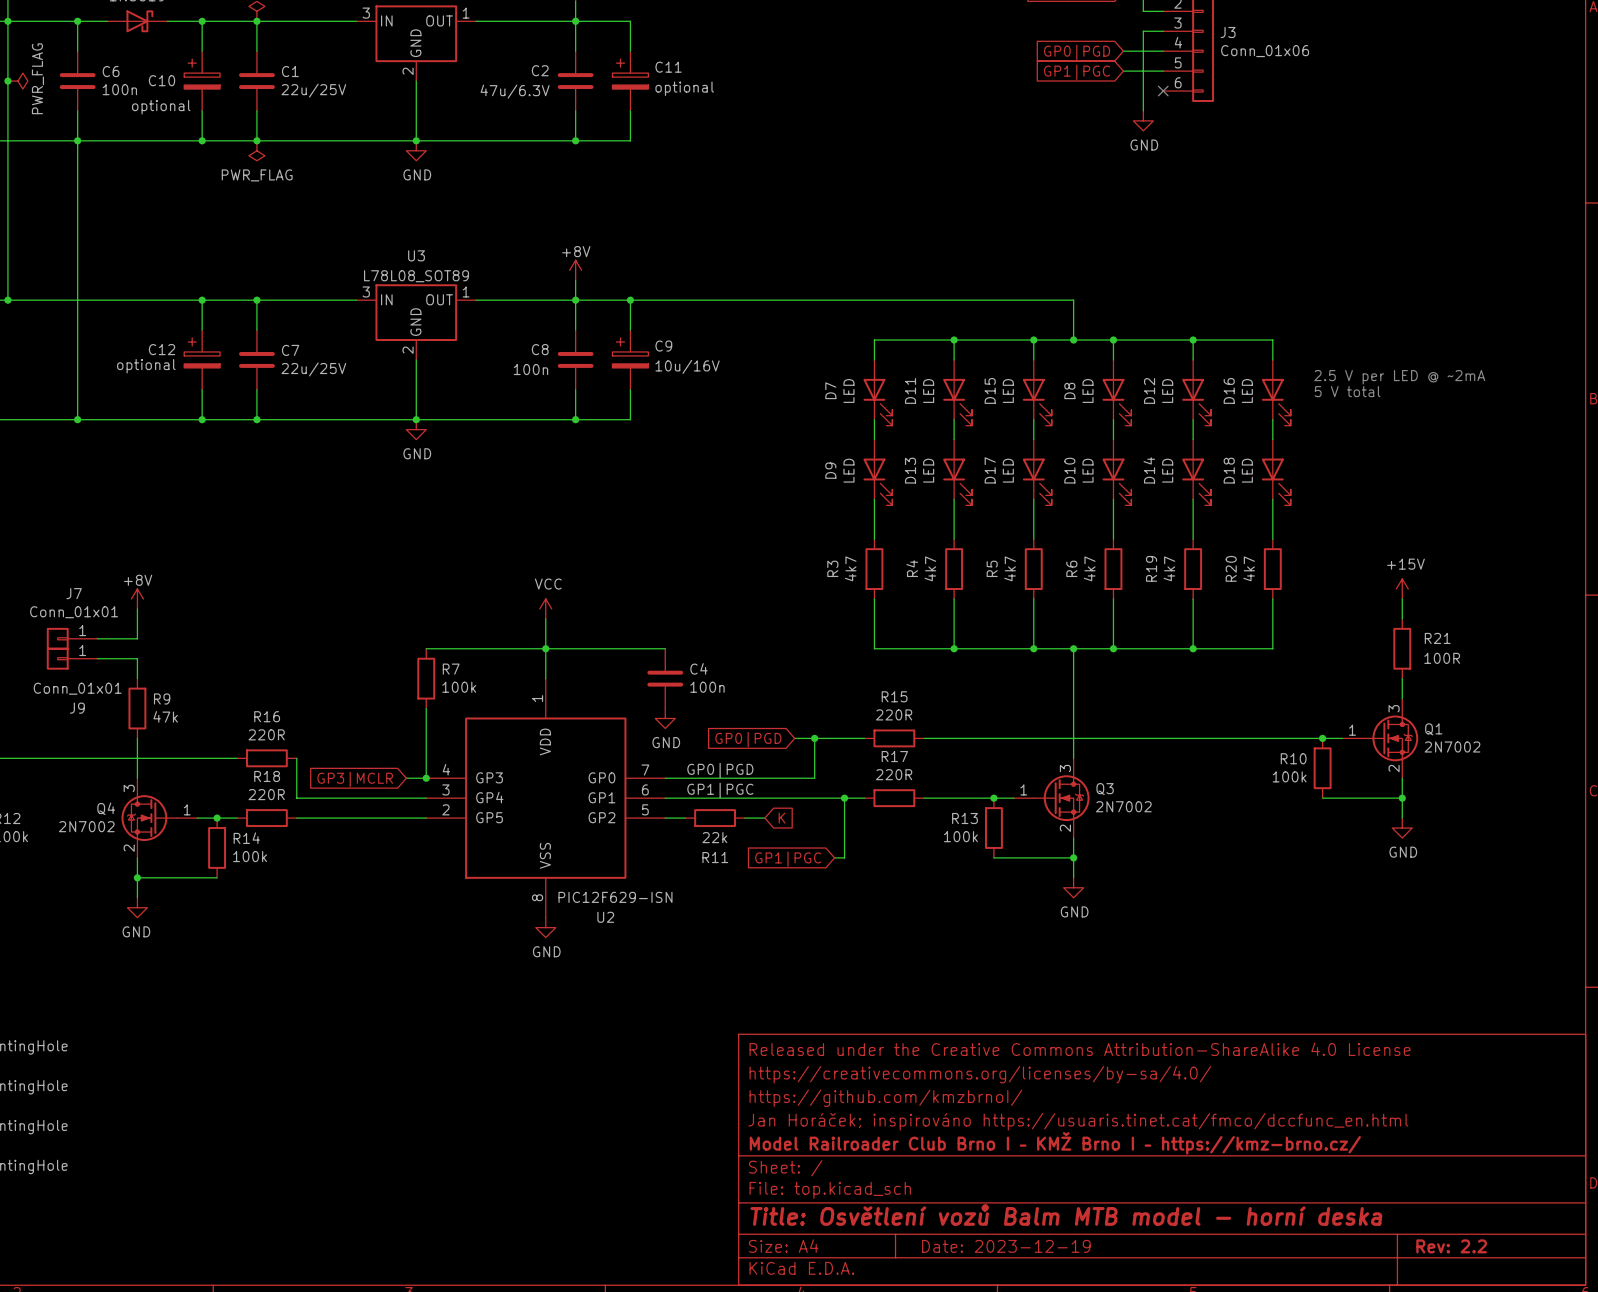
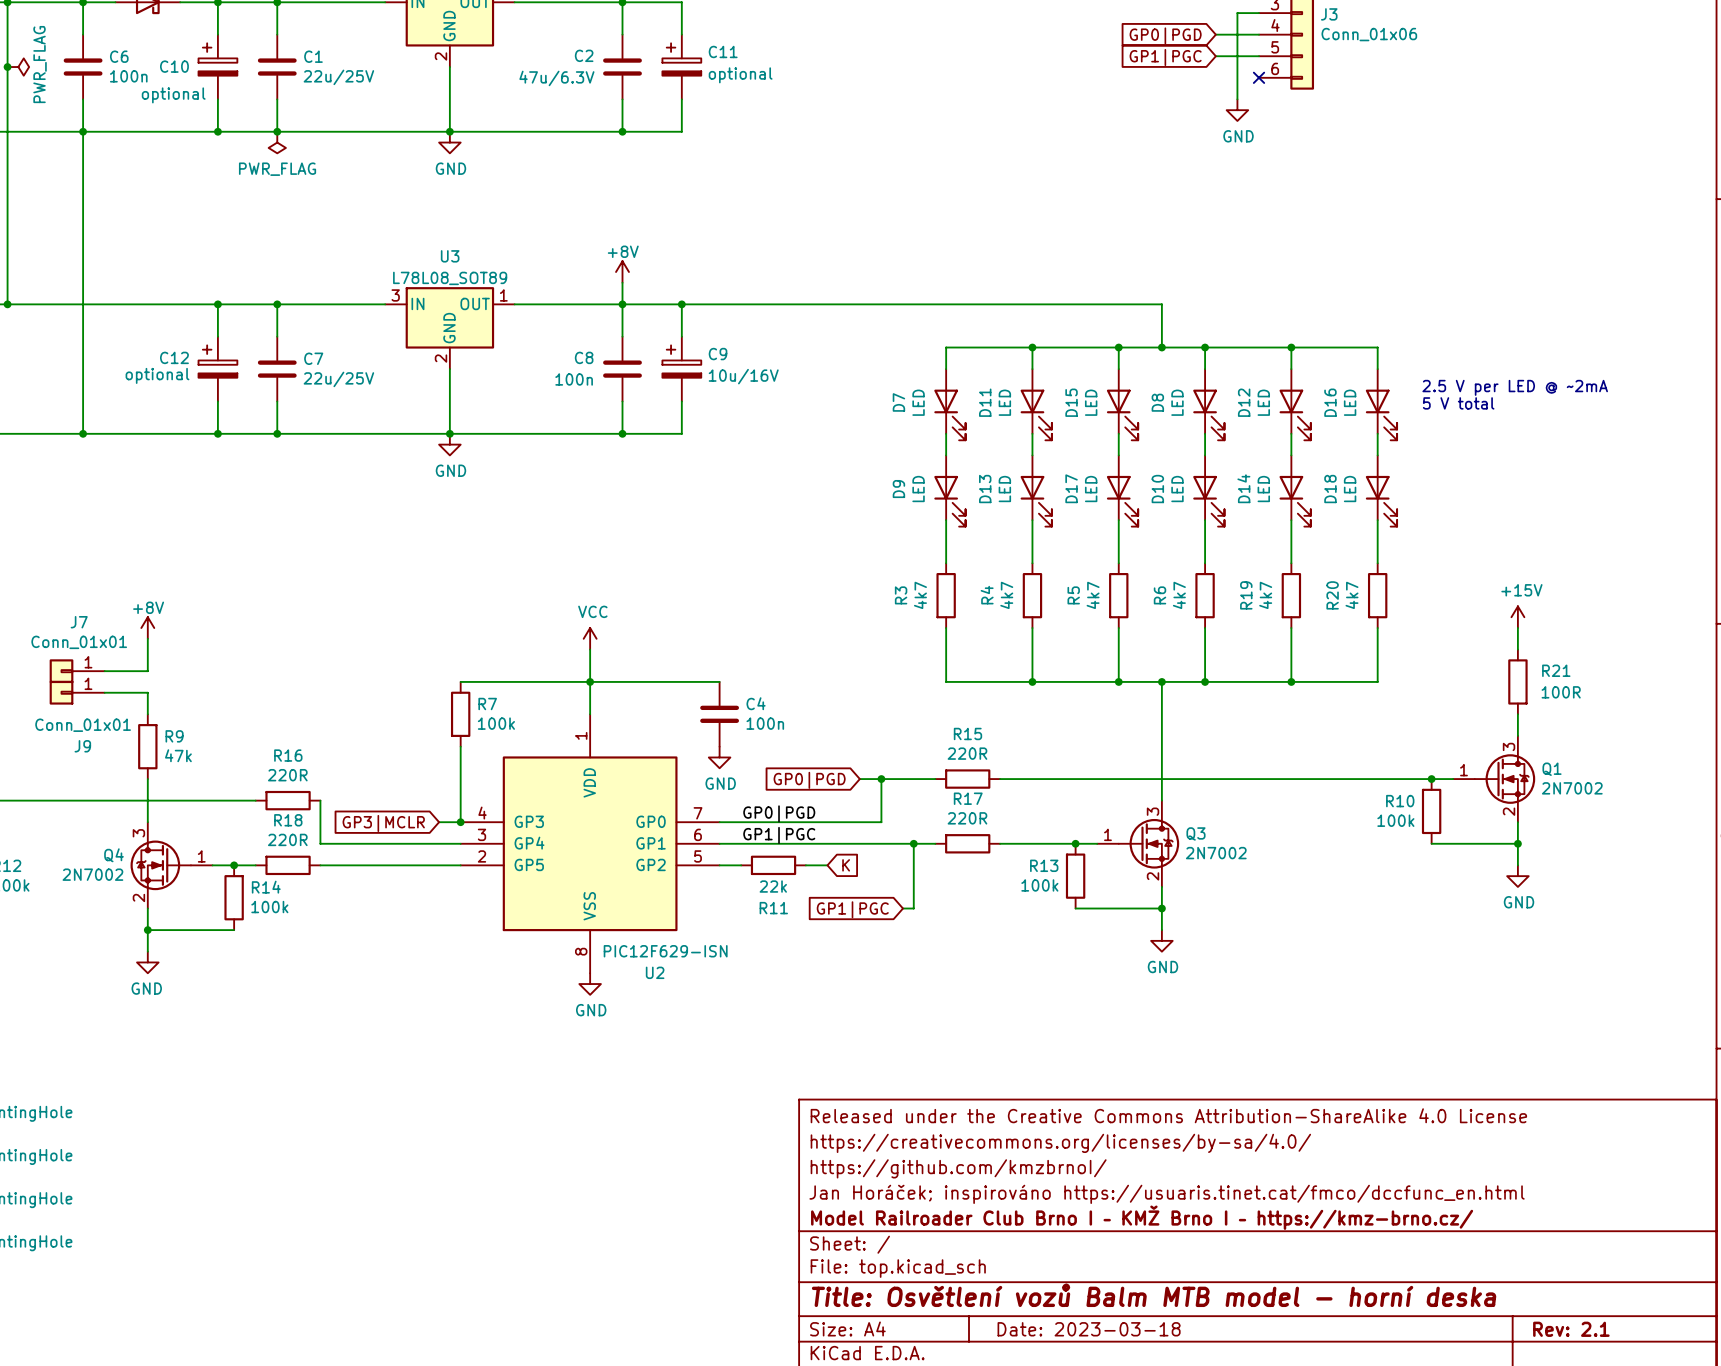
title block: Date: 2023-12-19 (1006, 1246) -> Date: 2023-03-18 (1089, 1329)
title block: Rev: 2.2 (1451, 1246) -> Rev: 2.1 (1571, 1329)

